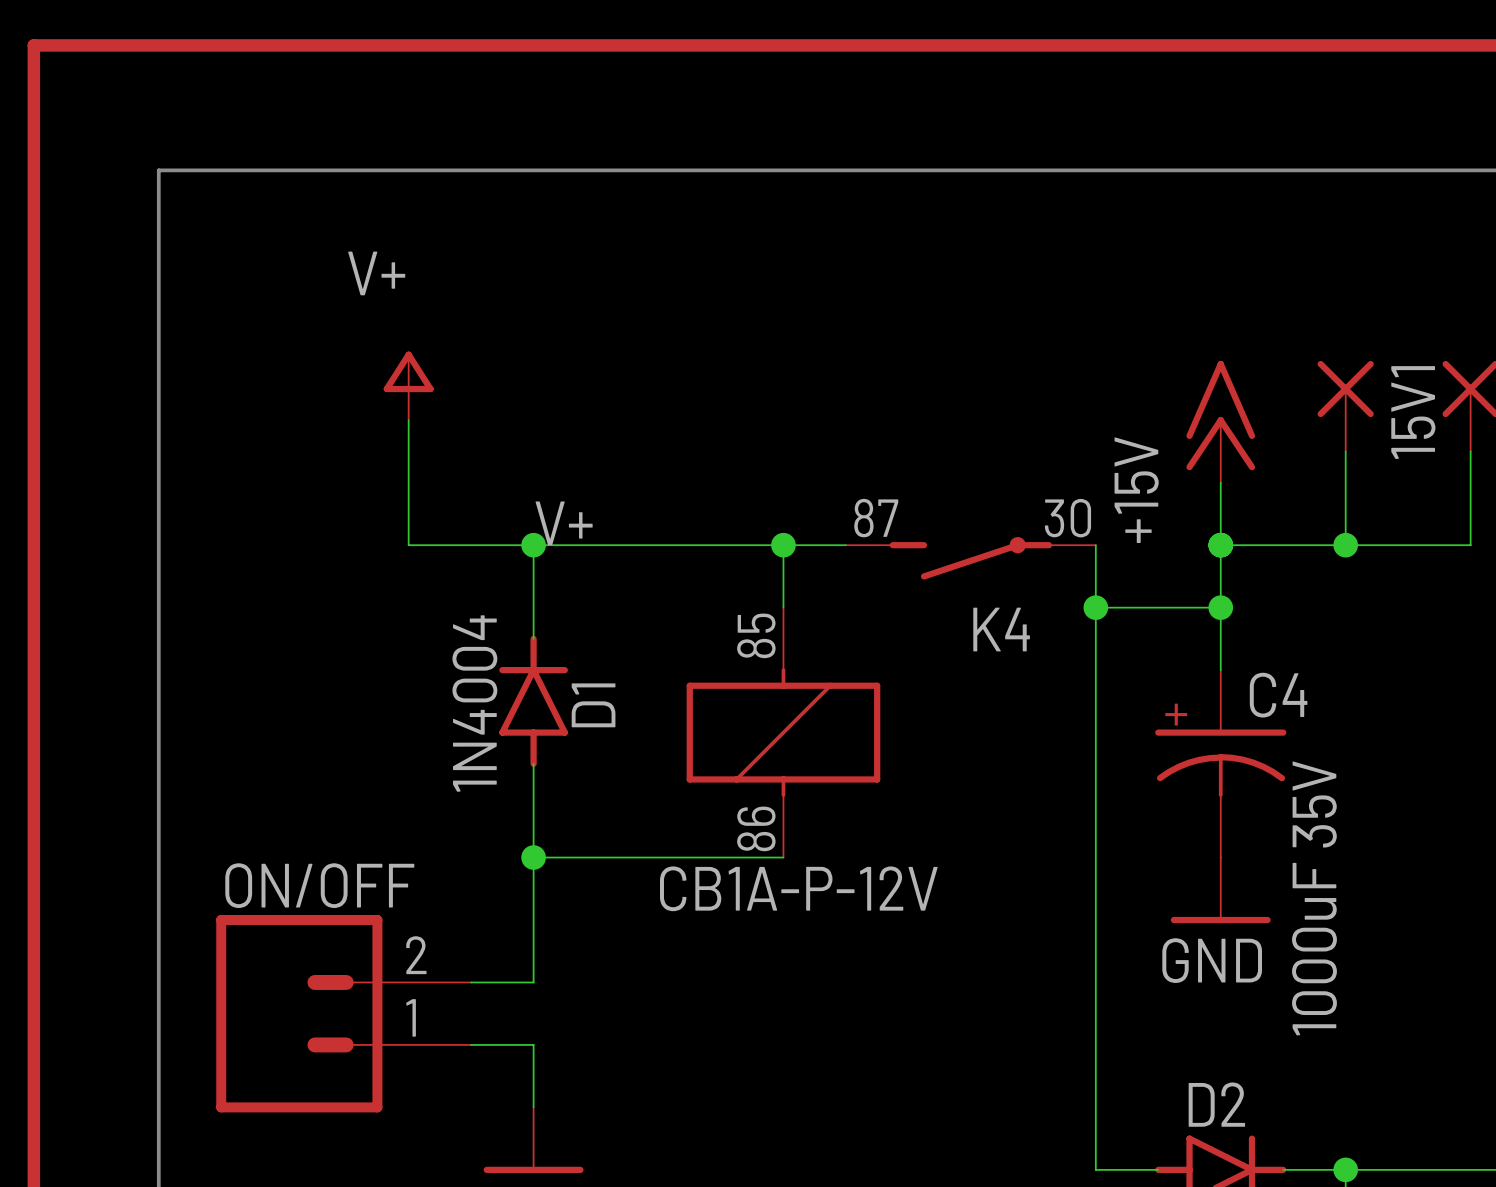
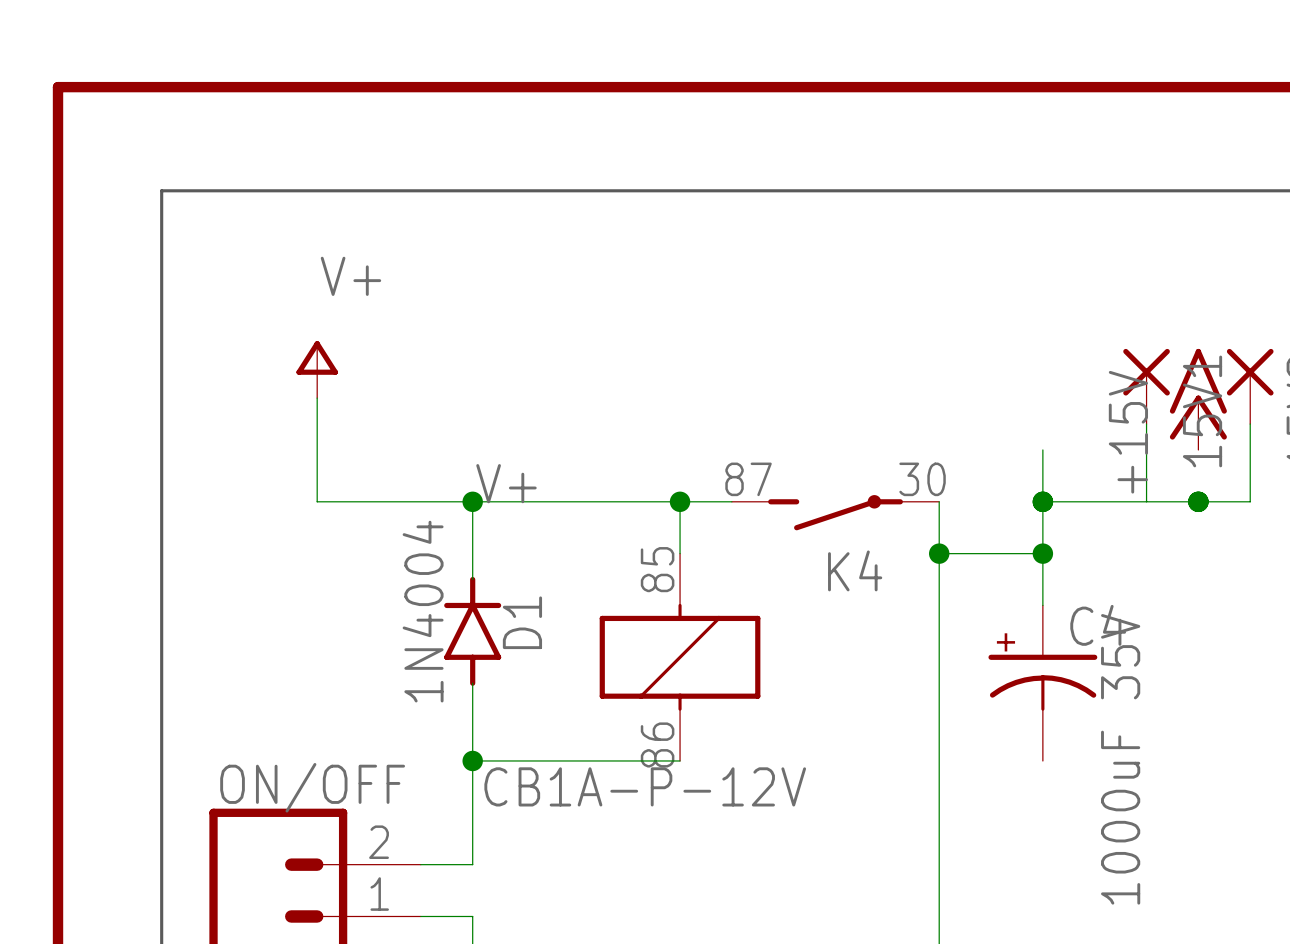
power symbol position: (408, 385) -> (317, 369)
wire: (408, 420) (408, 545) -> (317, 398) (317, 501) (369, 501)
power symbol position: +15V (1220, 421) -> +15V (1198, 399)
junction position: (1345, 545) -> (1198, 501)
power symbol: GND (1220, 890) -> none

